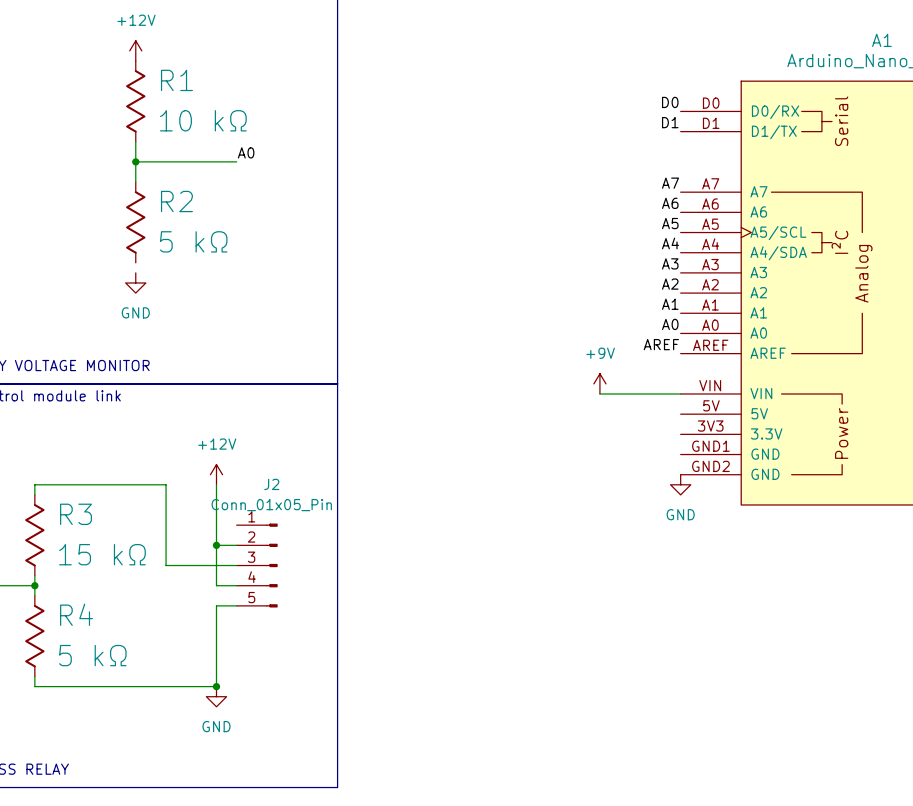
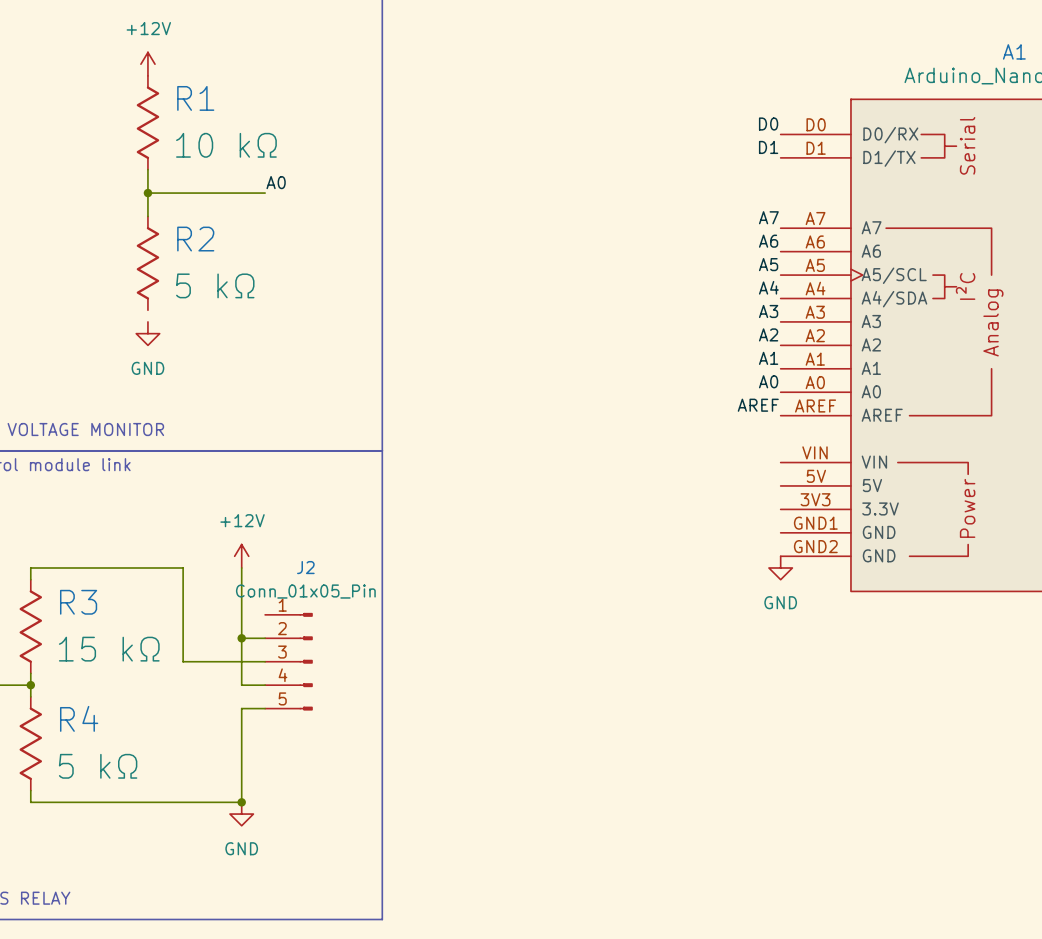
power symbol: +9V (599, 383) -> none
wire: (599, 393) (680, 393) -> none

